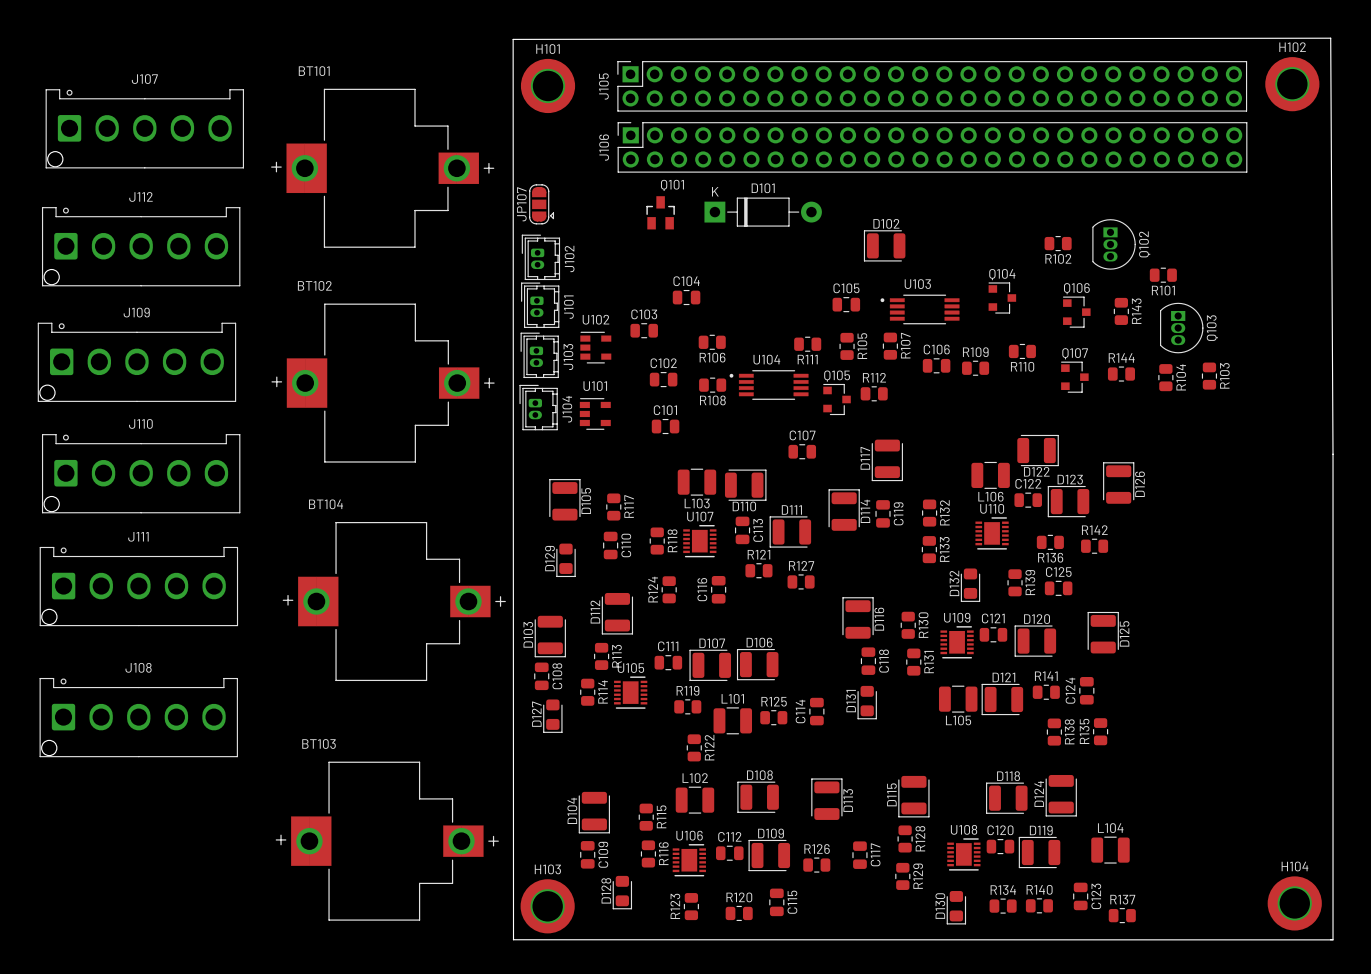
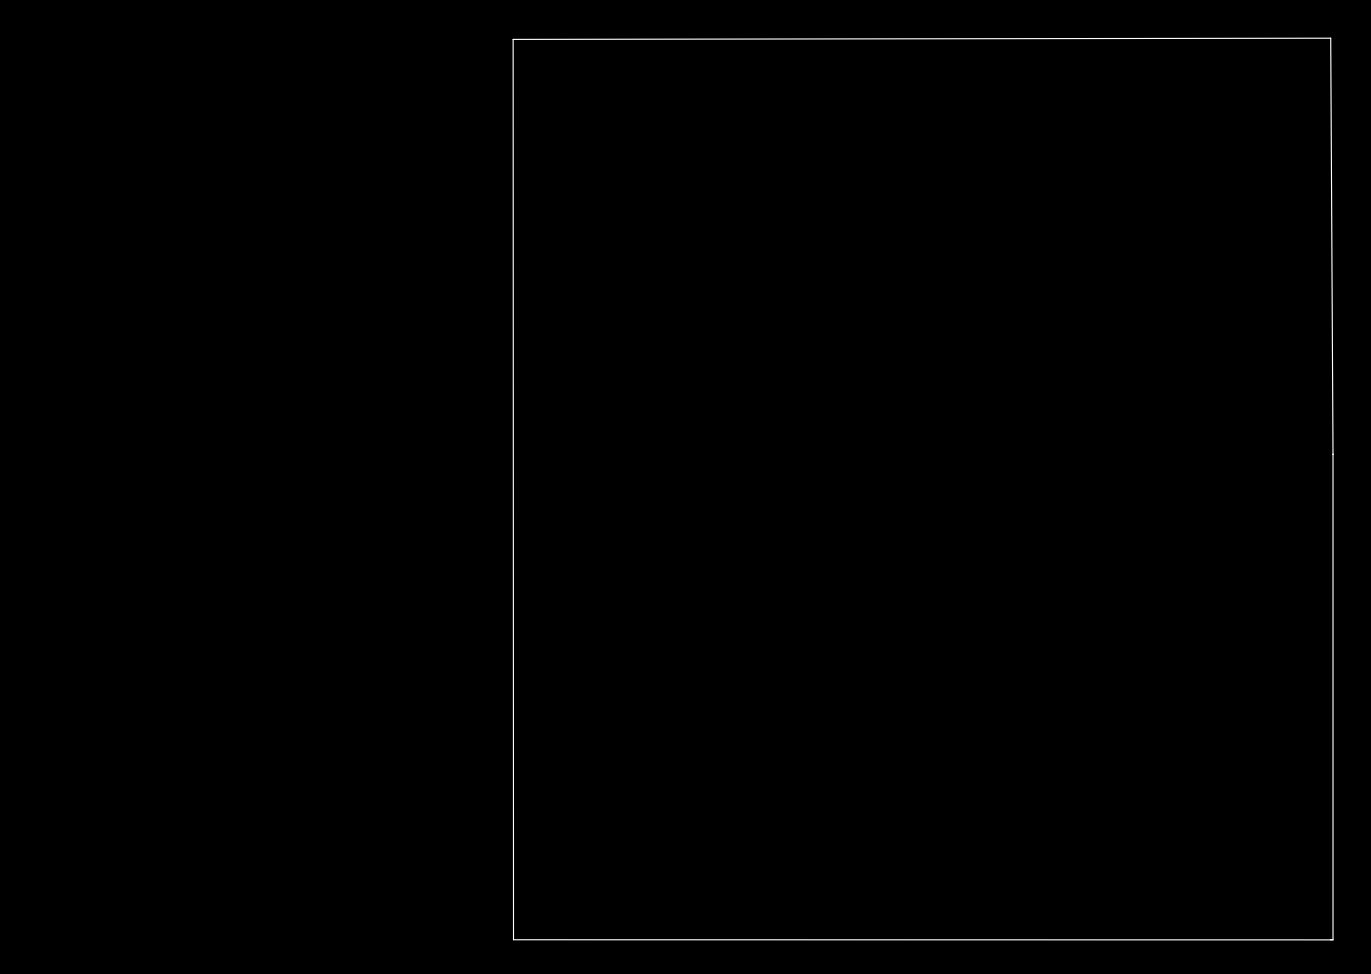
H102: (1292, 84) -> none
H101: (548, 85) -> none
J105: (932, 86) -> none
J107: (144, 128) -> none
J106: (932, 147) -> none
BT101: (382, 168) -> none
JP107: (541, 204) -> none
Q101: (660, 212) -> none
D101: (763, 212) -> none
R102: (1058, 243) -> none
Q102: (1114, 244) -> none
D102: (884, 245) -> none
J112: (141, 246) -> none
J102: (540, 257) -> none
R101: (1163, 275) -> none
C104: (686, 297) -> none
Q104: (1002, 298) -> none
C105: (846, 304) -> none
J101: (540, 305) -> none
U103: (919, 309) -> none
R143: (1121, 311) -> none
Q106: (1076, 312) -> none
Q103: (1181, 328) -> none
C103: (644, 330) -> none
R106: (712, 342) -> none
R111: (807, 344) -> none
R105: (847, 346) -> none
R107: (890, 346) -> none
U102: (595, 347) -> none
R110: (1022, 351) -> none
J103: (539, 355) -> none
J109: (136, 362) -> none
C106: (936, 365) -> none
R109: (975, 368) -> none
R144: (1121, 374) -> none
R103: (1209, 376) -> none
Q107: (1074, 377) -> none
R104: (1165, 377) -> none
C102: (663, 379) -> none
BT102: (383, 383) -> none
R108: (712, 385) -> none
U104: (769, 385) -> none
R112: (874, 393) -> none
Q105: (836, 399) -> none
J104: (538, 407) -> none
U101: (595, 413) -> none
C101: (665, 426) -> none
D122: (1038, 450) -> none
C107: (802, 451) -> none
D117: (887, 460) -> none
J110: (141, 473) -> none
L106: (990, 475) -> none
L103: (696, 482) -> none
D126: (1118, 483) -> none
D110: (745, 485) -> none
D105: (564, 499) -> none
C122: (1028, 500) -> none
D123: (1068, 501) -> none
R117: (613, 507) -> none
D114: (844, 510) -> none
C119: (883, 513) -> none
R132: (929, 513) -> none
C113: (742, 530) -> none
D111: (790, 531) -> none
U110: (992, 533) -> none
R118: (657, 541) -> none
U107: (699, 541) -> none
R136: (1050, 542) -> none
C110: (610, 545) -> none
R142: (1094, 546) -> none
R133: (929, 549) -> none
D129: (566, 560) -> none
R121: (758, 570) -> none
R127: (801, 581) -> none
R139: (1015, 582) -> none
D132: (970, 585) -> none
J111: (138, 586) -> none
C125: (1058, 588) -> none
R124: (669, 589) -> none
C116: (718, 589) -> none
BT104: (394, 601) -> none
D112: (617, 613) -> none
D116: (858, 617) -> none
R130: (908, 625) -> none
D125: (1103, 632) -> none
C121: (993, 634) -> none
D103: (550, 636) -> none
D120: (1035, 641) -> none
U109: (957, 642) -> none
R113: (601, 656) -> none
C118: (868, 661) -> none
C111: (668, 662) -> none
R131: (913, 662) -> none
D106: (757, 664) -> none
D107: (710, 665) -> none
C108: (541, 676) -> none
C124: (1086, 690) -> none
R114: (587, 692) -> none
U105: (630, 692) -> none
R141: (1046, 692) -> none
L105: (958, 699) -> none
D121: (1002, 699) -> none
D131: (867, 702) -> none
R119: (687, 706) -> none
C114: (816, 711) -> none
D127: (552, 716) -> none
J108: (138, 717) -> none
R125: (773, 717) -> none
L101: (732, 720) -> none
R135: (1100, 731) -> none
R138: (1054, 732) -> none
R122: (694, 747) -> none
D124: (1061, 795) -> none
D115: (913, 796) -> none
D108: (758, 797) -> none
D118: (1006, 798) -> none
D113: (826, 799) -> none
L102: (694, 800) -> none
D104: (594, 812) -> none
R115: (646, 817) -> none
R128: (905, 838) -> none
BT103: (387, 841) -> none
C120: (1000, 846) -> none
L104: (1110, 850) -> none
D119: (1039, 852) -> none
R116: (648, 853) -> none
C112: (729, 853) -> none
C109: (587, 854) -> none
U108: (963, 854) -> none
D109: (769, 855) -> none
C117: (859, 855) -> none
U106: (689, 860) -> none
R126: (816, 865) -> none
R129: (902, 876) -> none
D128: (622, 892) -> none
C123: (1080, 896) -> none
C115: (776, 902) -> none
H104: (1294, 903) -> none
R140: (1039, 905) -> none
H103: (547, 906) -> none
R123: (691, 906) -> none
R134: (1003, 906) -> none
D130: (956, 907) -> none
R120: (739, 913) -> none
R137: (1122, 915) -> none

